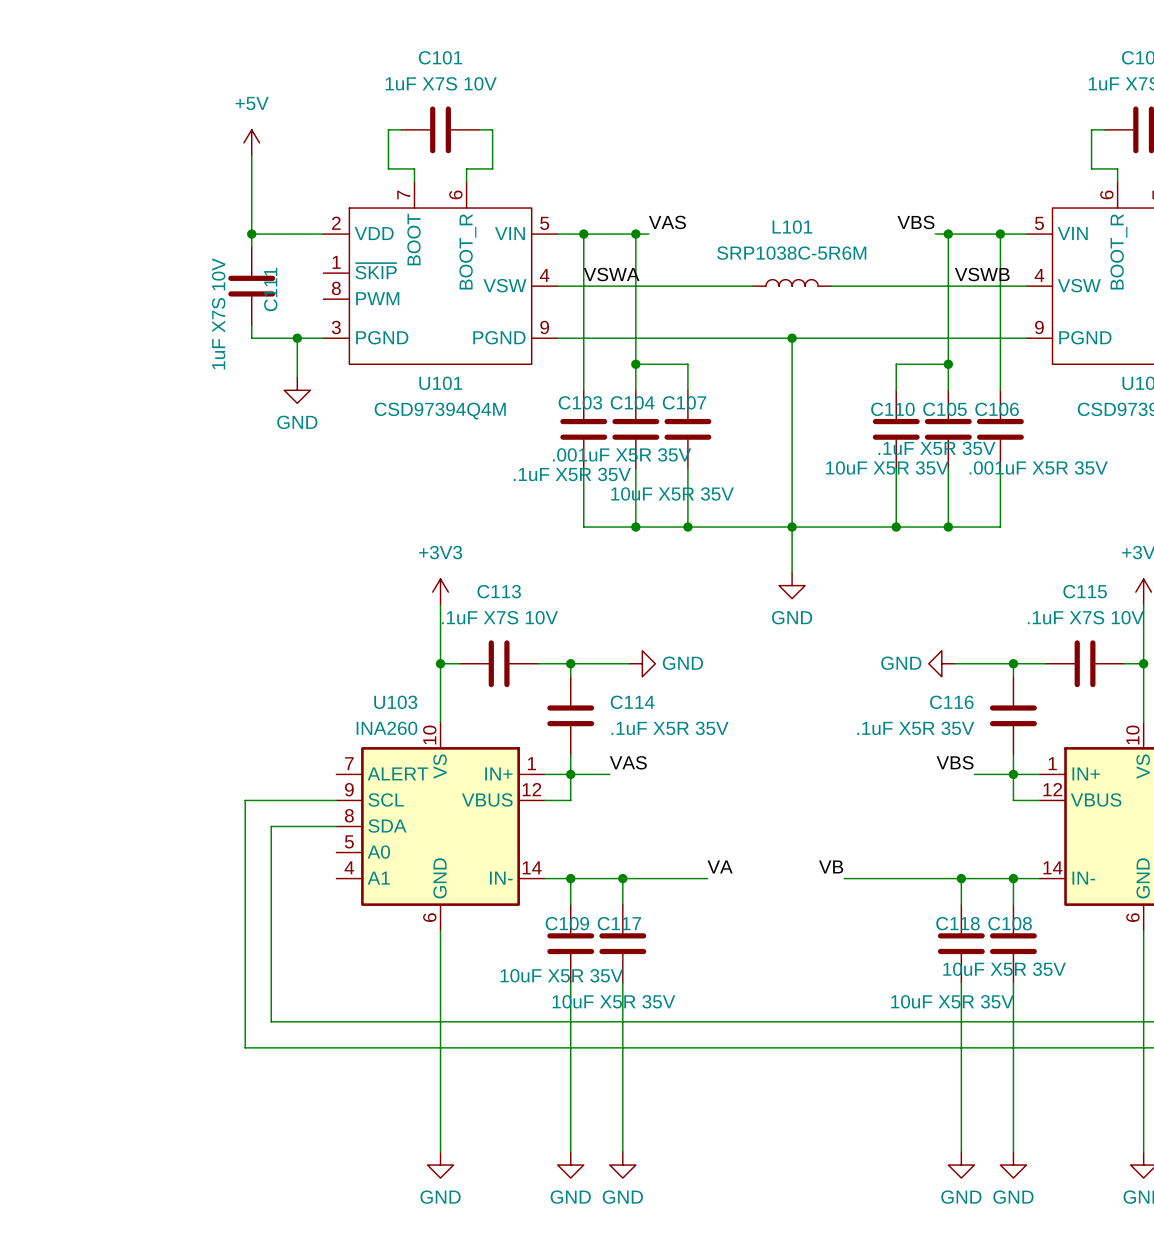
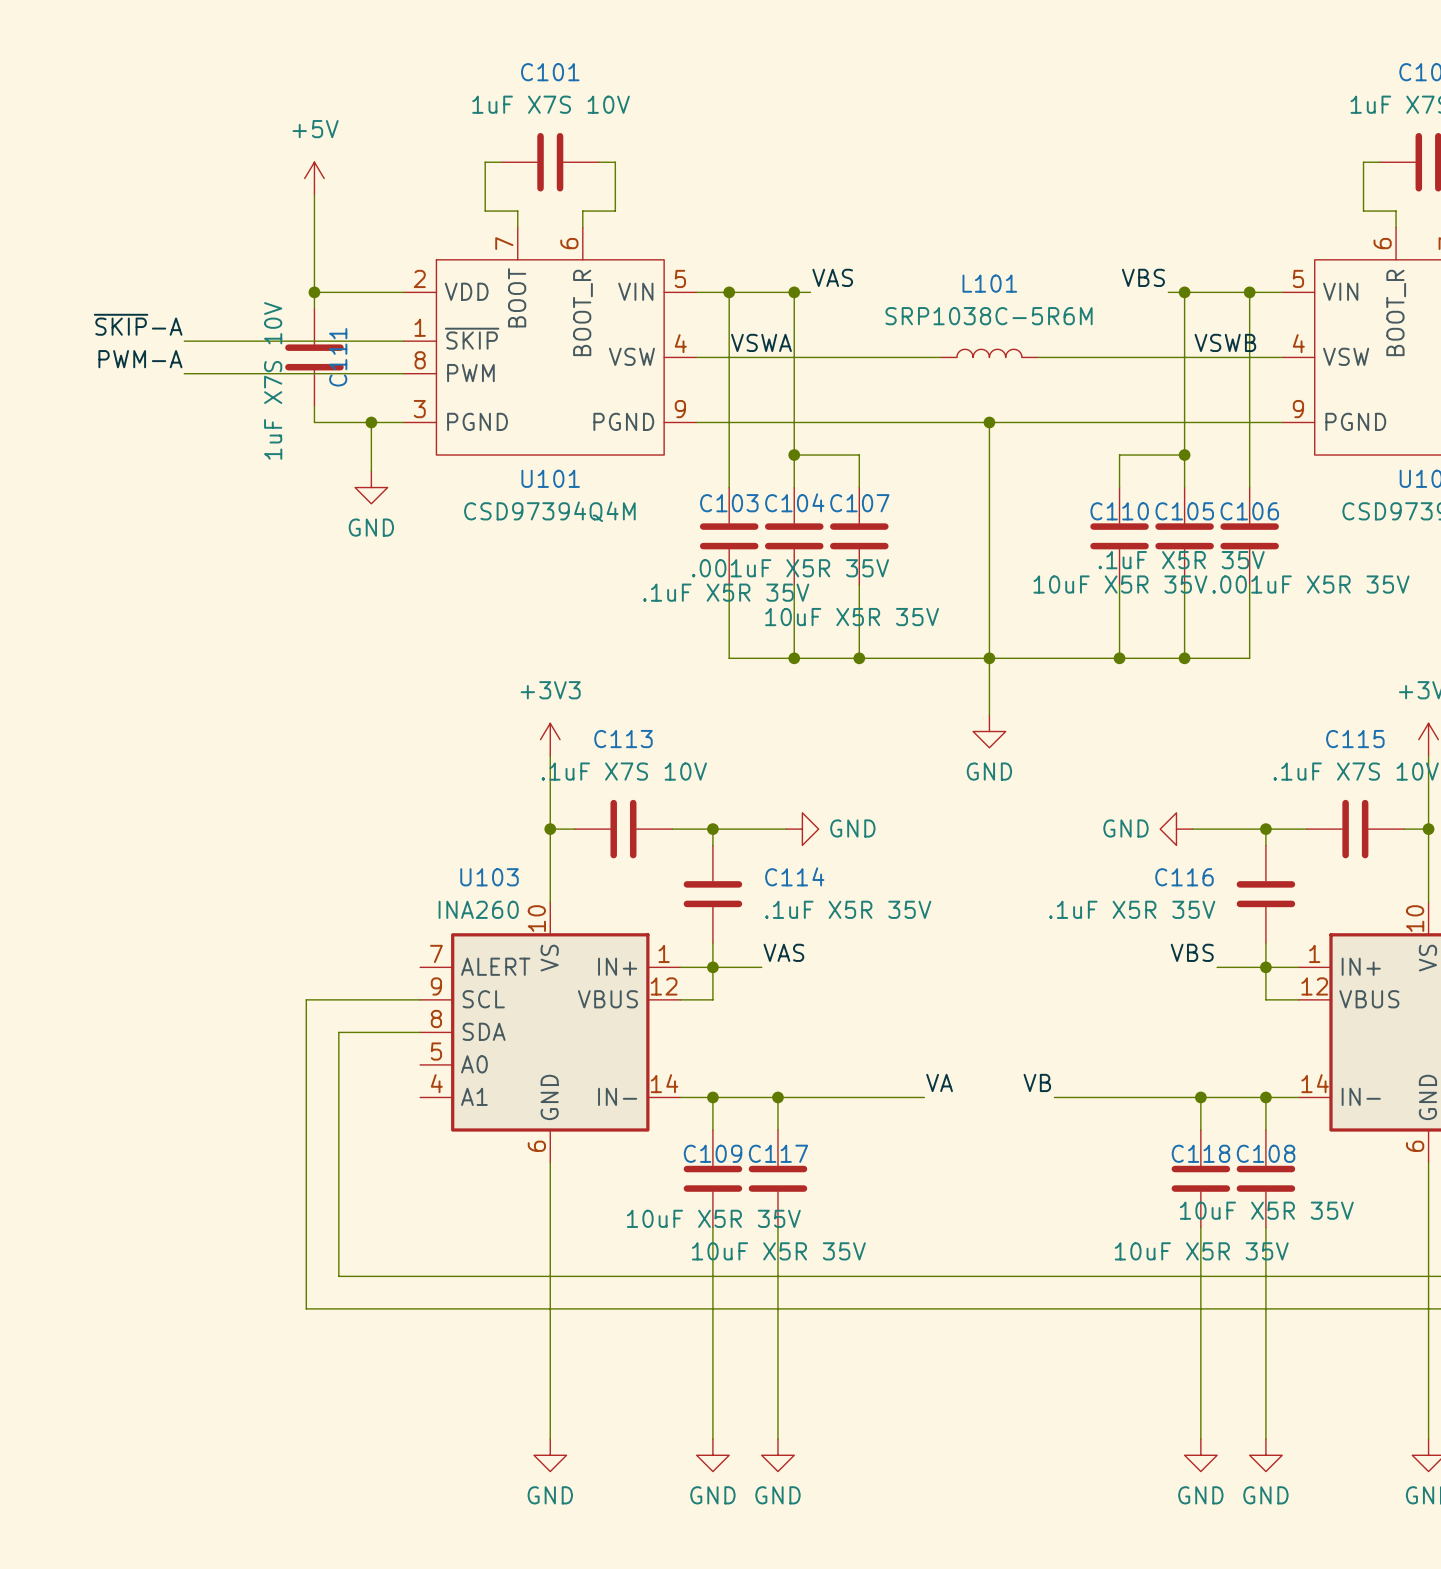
label: none -> ~{SKIP}-A (138, 324)
wire: none -> (184, 341) (403, 341)
label: none -> PWM-A (140, 359)
wire: none -> (184, 373) (403, 373)
label position: VA (720, 866) -> VA (939, 1082)
wire: none -> (883, 1097) (924, 1097)

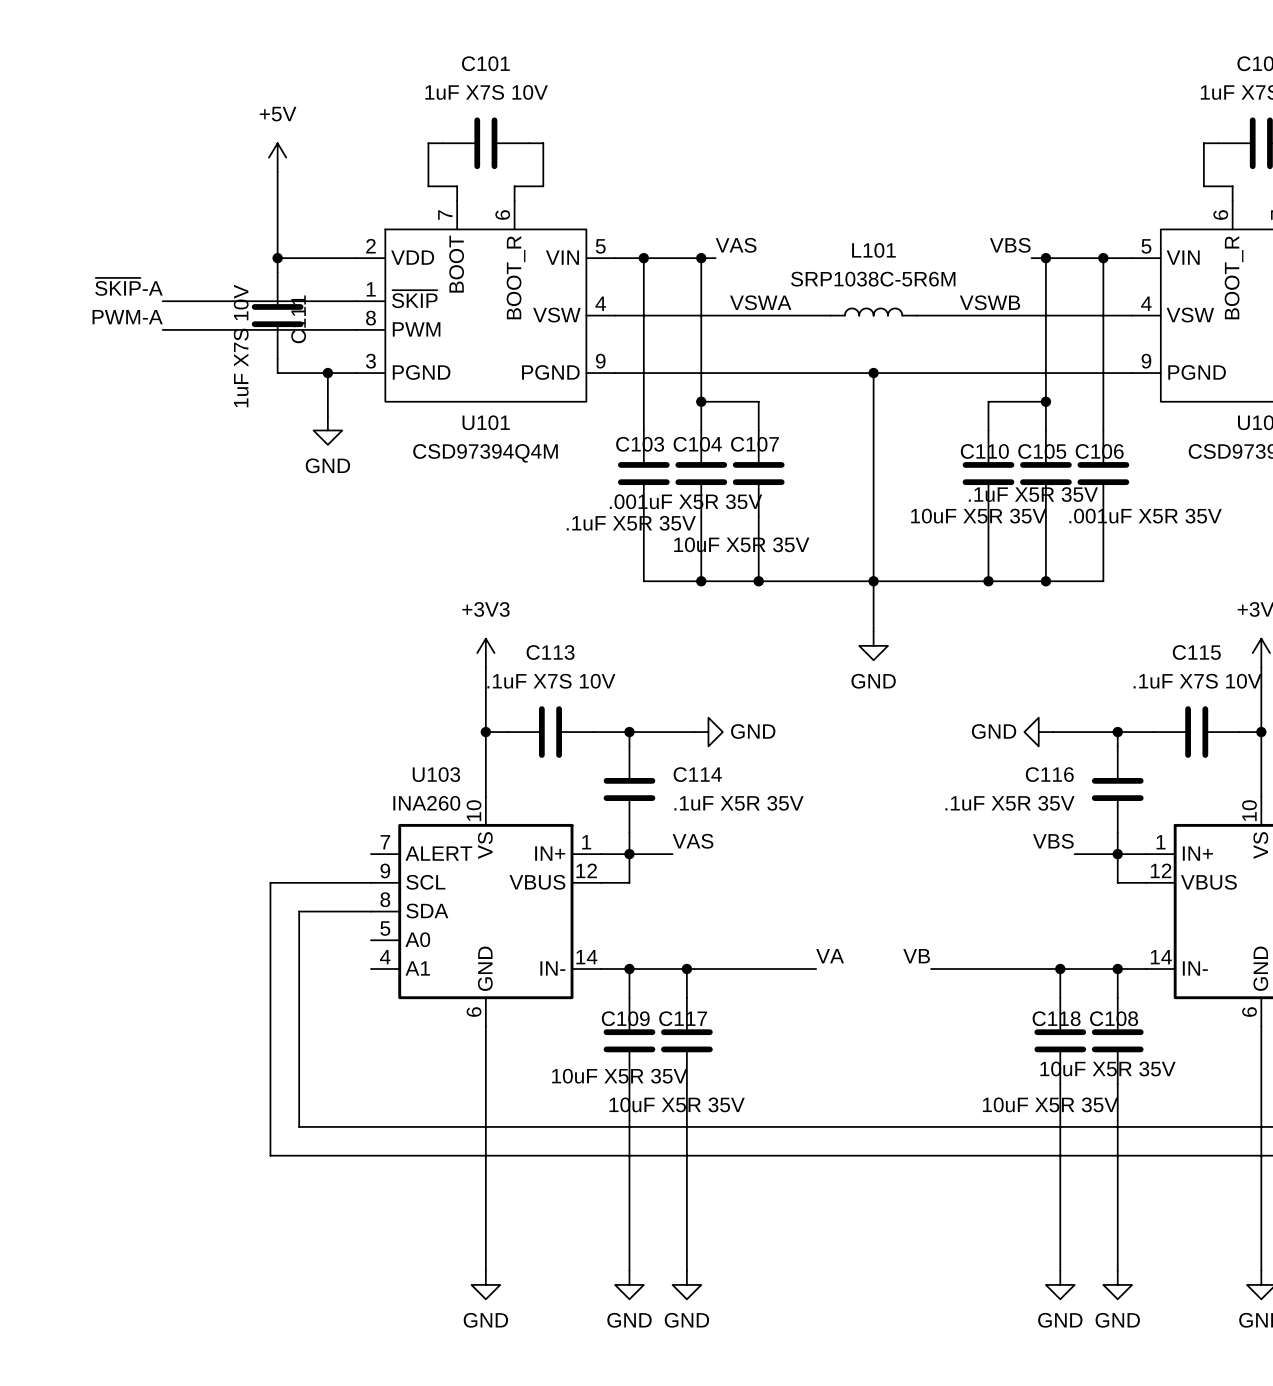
label position: VSWA (761, 342) -> VSWA (760, 302)
label position: VSWB (1225, 342) -> VSWB (989, 302)

